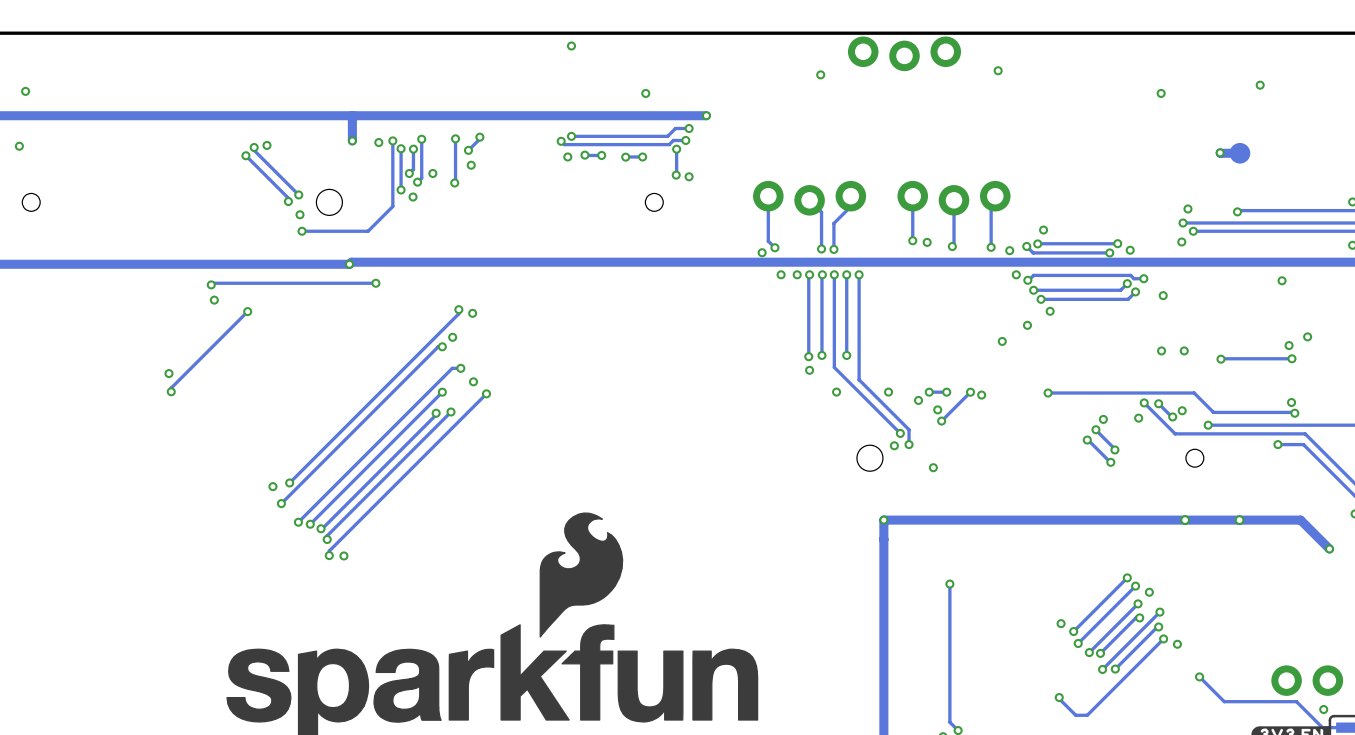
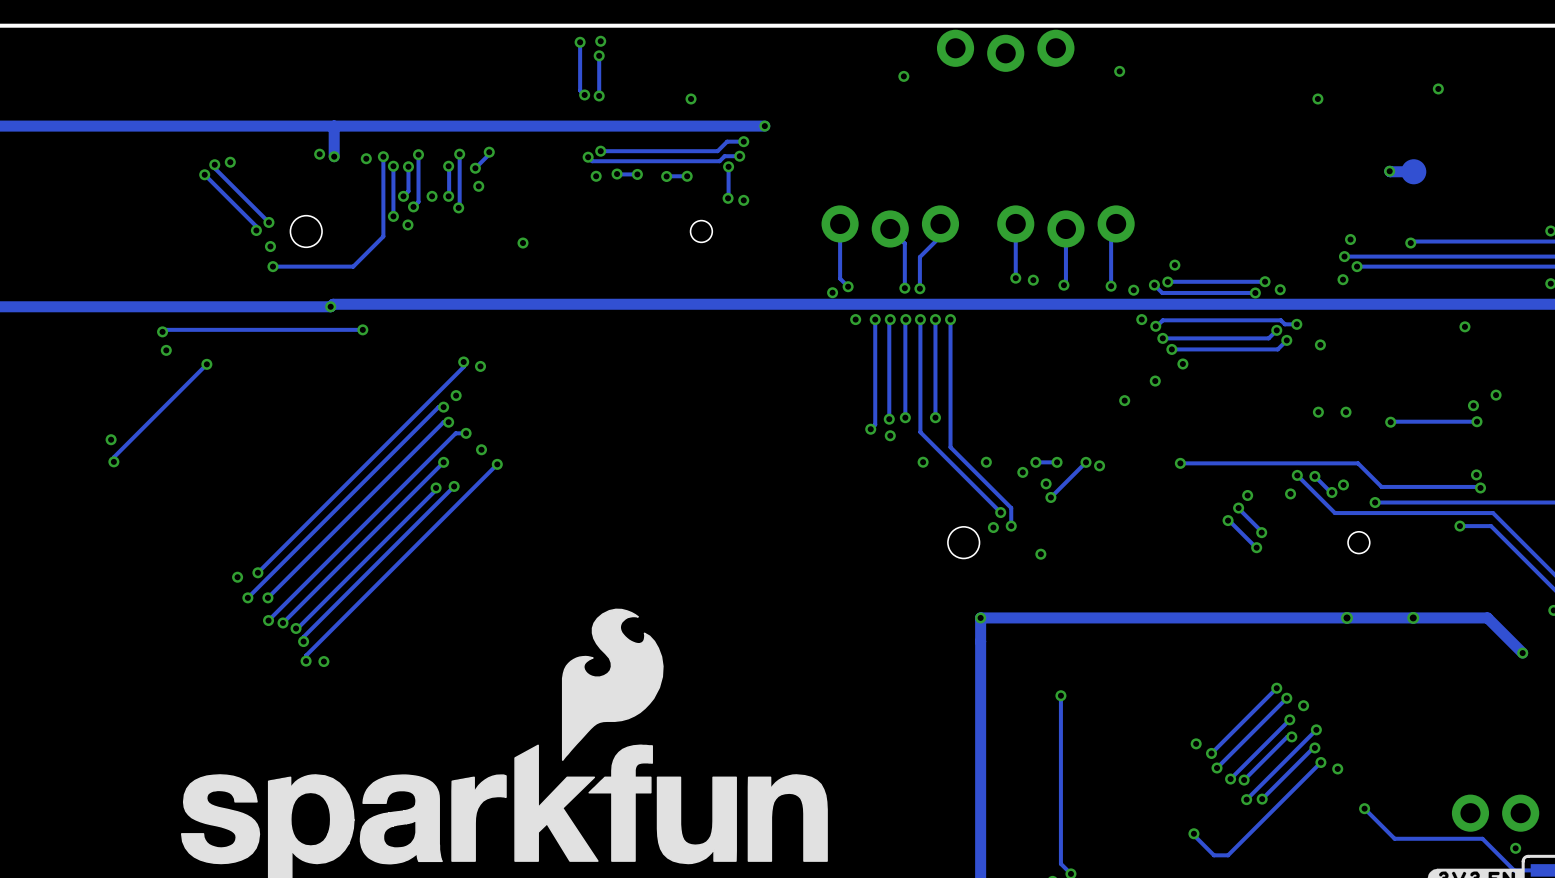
track: none -> (580, 42) (580, 90) (584, 94)
via: none -> (580, 42)
track: none -> (599, 55) (599, 95)
via: none -> (599, 55)
via: none -> (584, 94)
via: none -> (599, 95)
via: none -> (319, 154)
track: none -> (448, 166) (448, 196)
via: none -> (448, 166)
via: none -> (448, 196)
via: none -> (523, 243)
track: none -> (875, 319) (875, 424) (870, 429)
track: none -> (448, 422) (443, 422) (267, 597)
via: none -> (448, 422)
via: none -> (870, 429)
via: none -> (267, 597)

